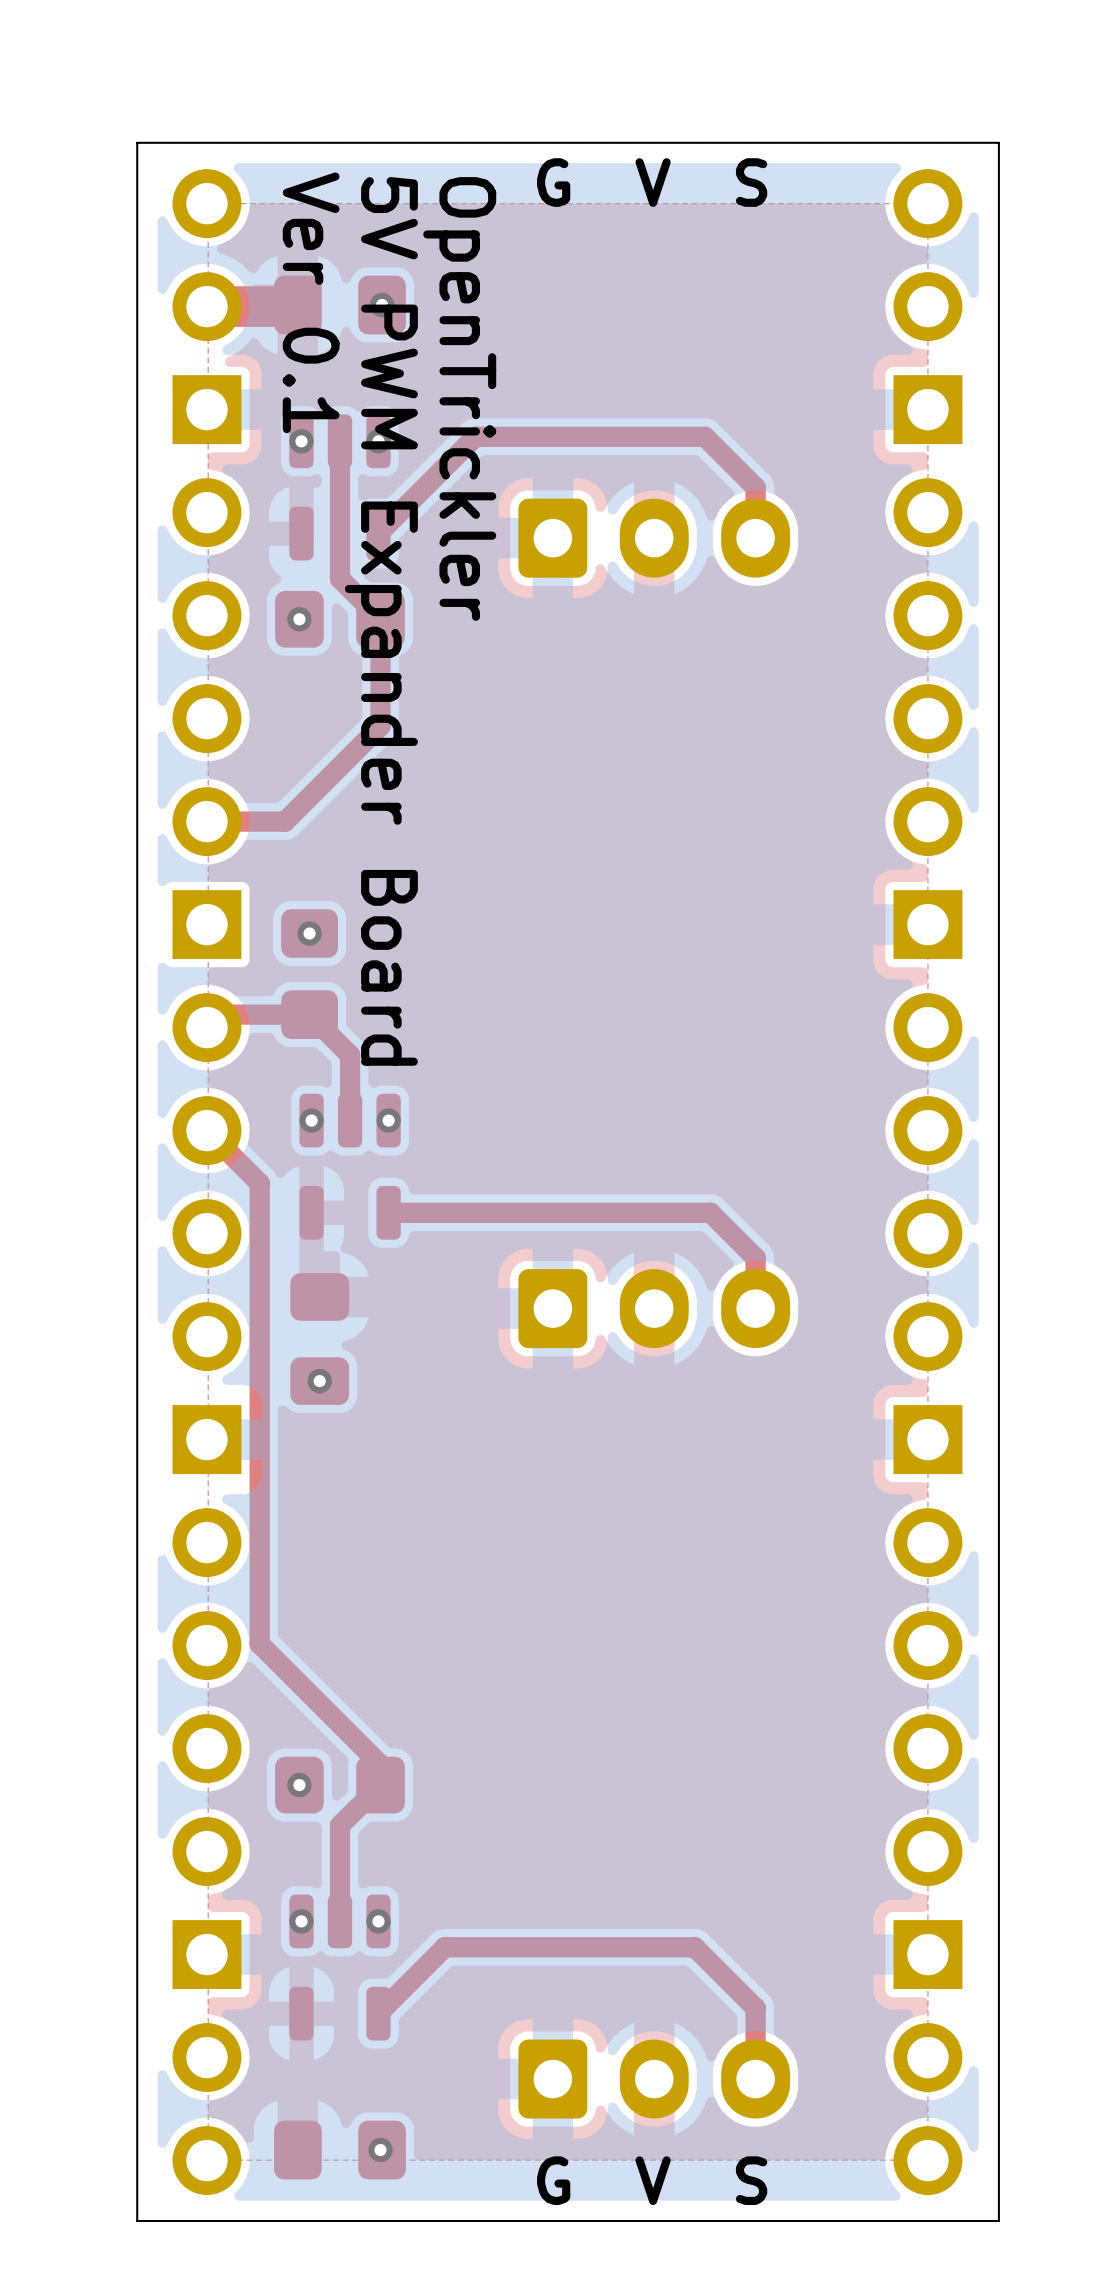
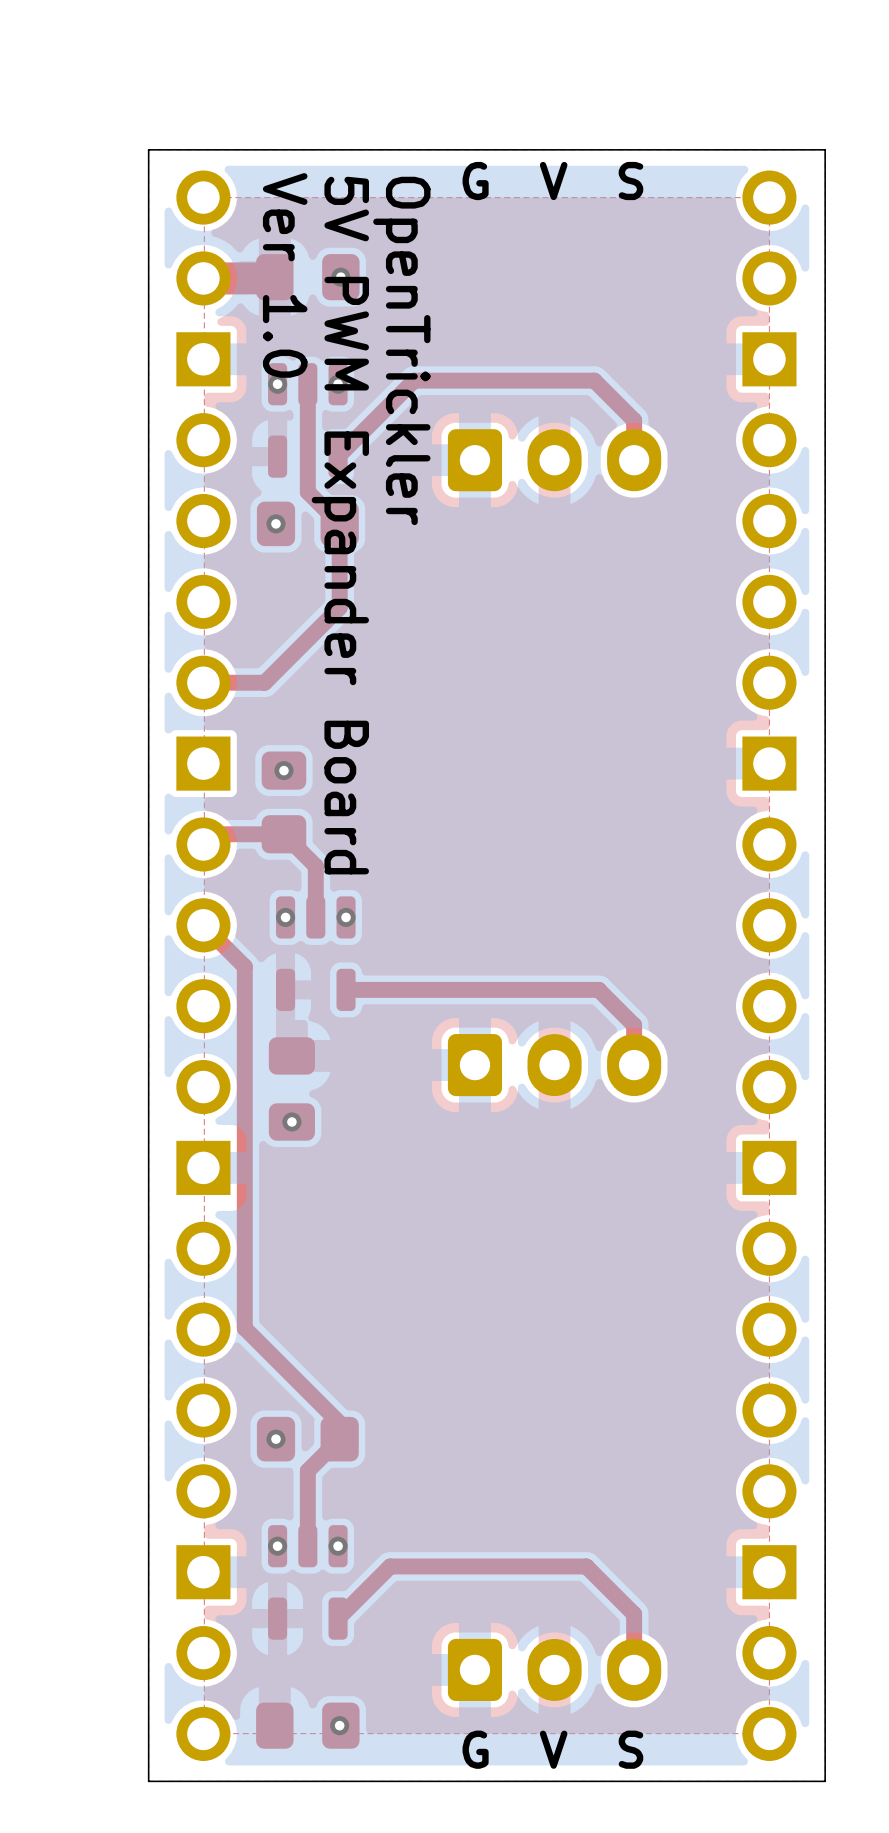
text: Ver 0.1 (311, 302) -> Ver 1.0 (285, 275)

